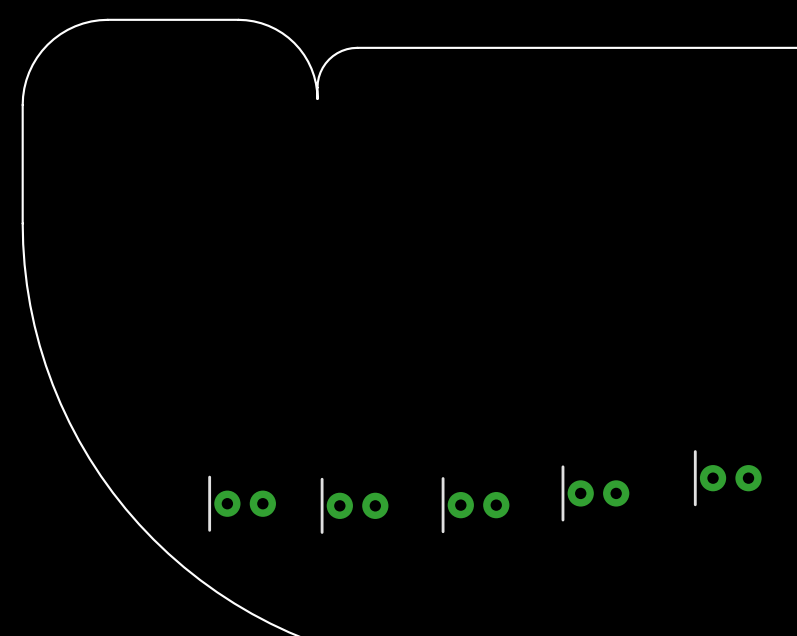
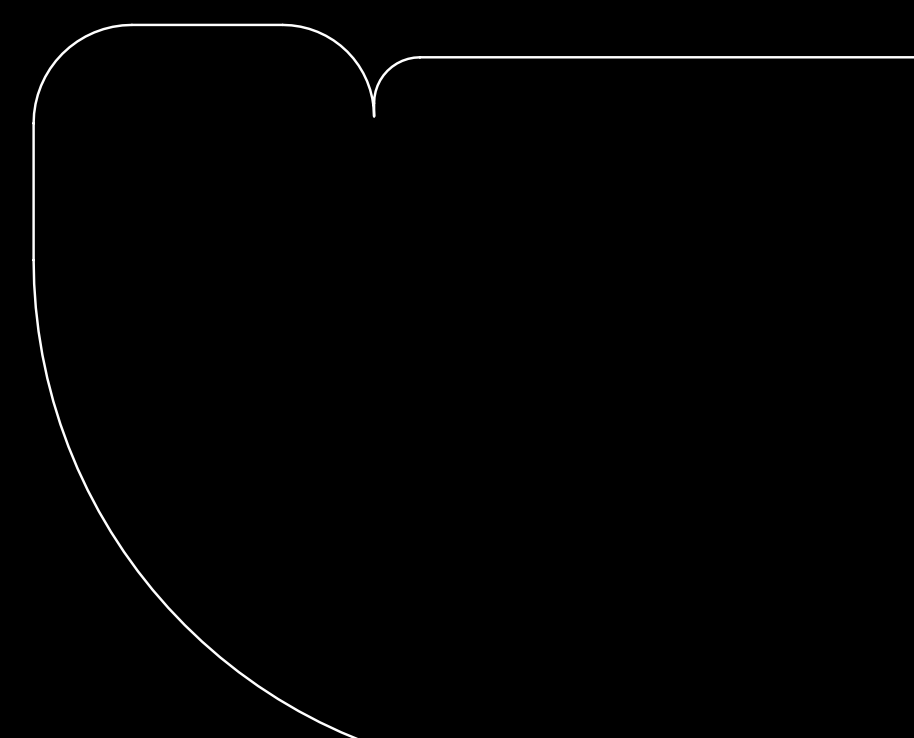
part: (727, 478) -> none
part: (595, 493) -> none
part: (242, 503) -> none
part: (354, 505) -> none
part: (475, 505) -> none

